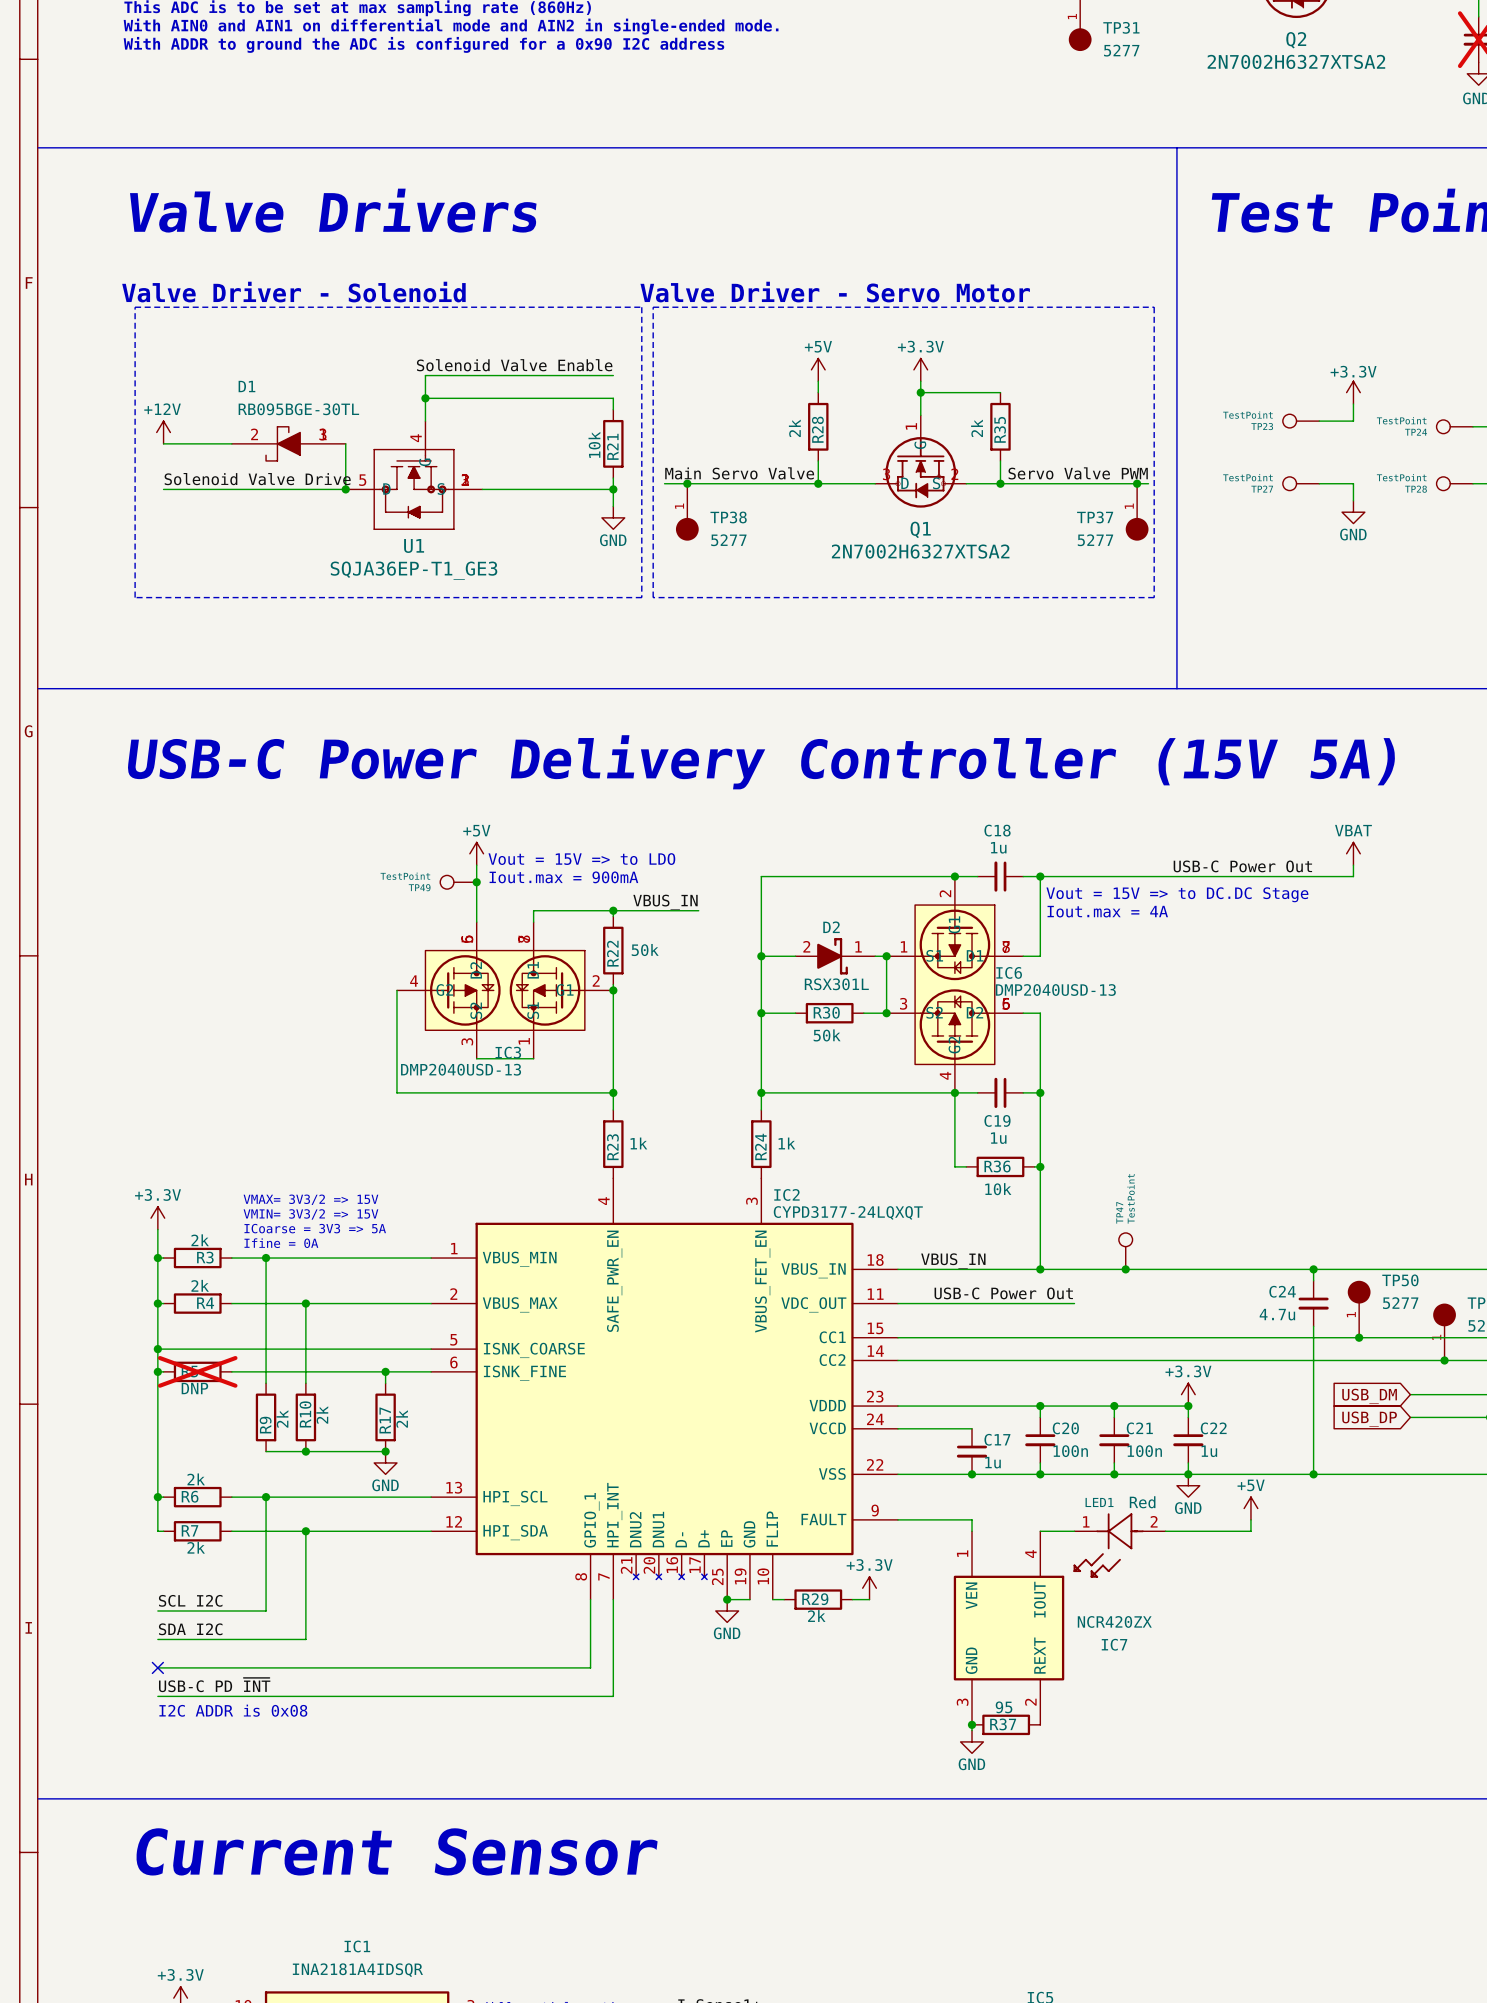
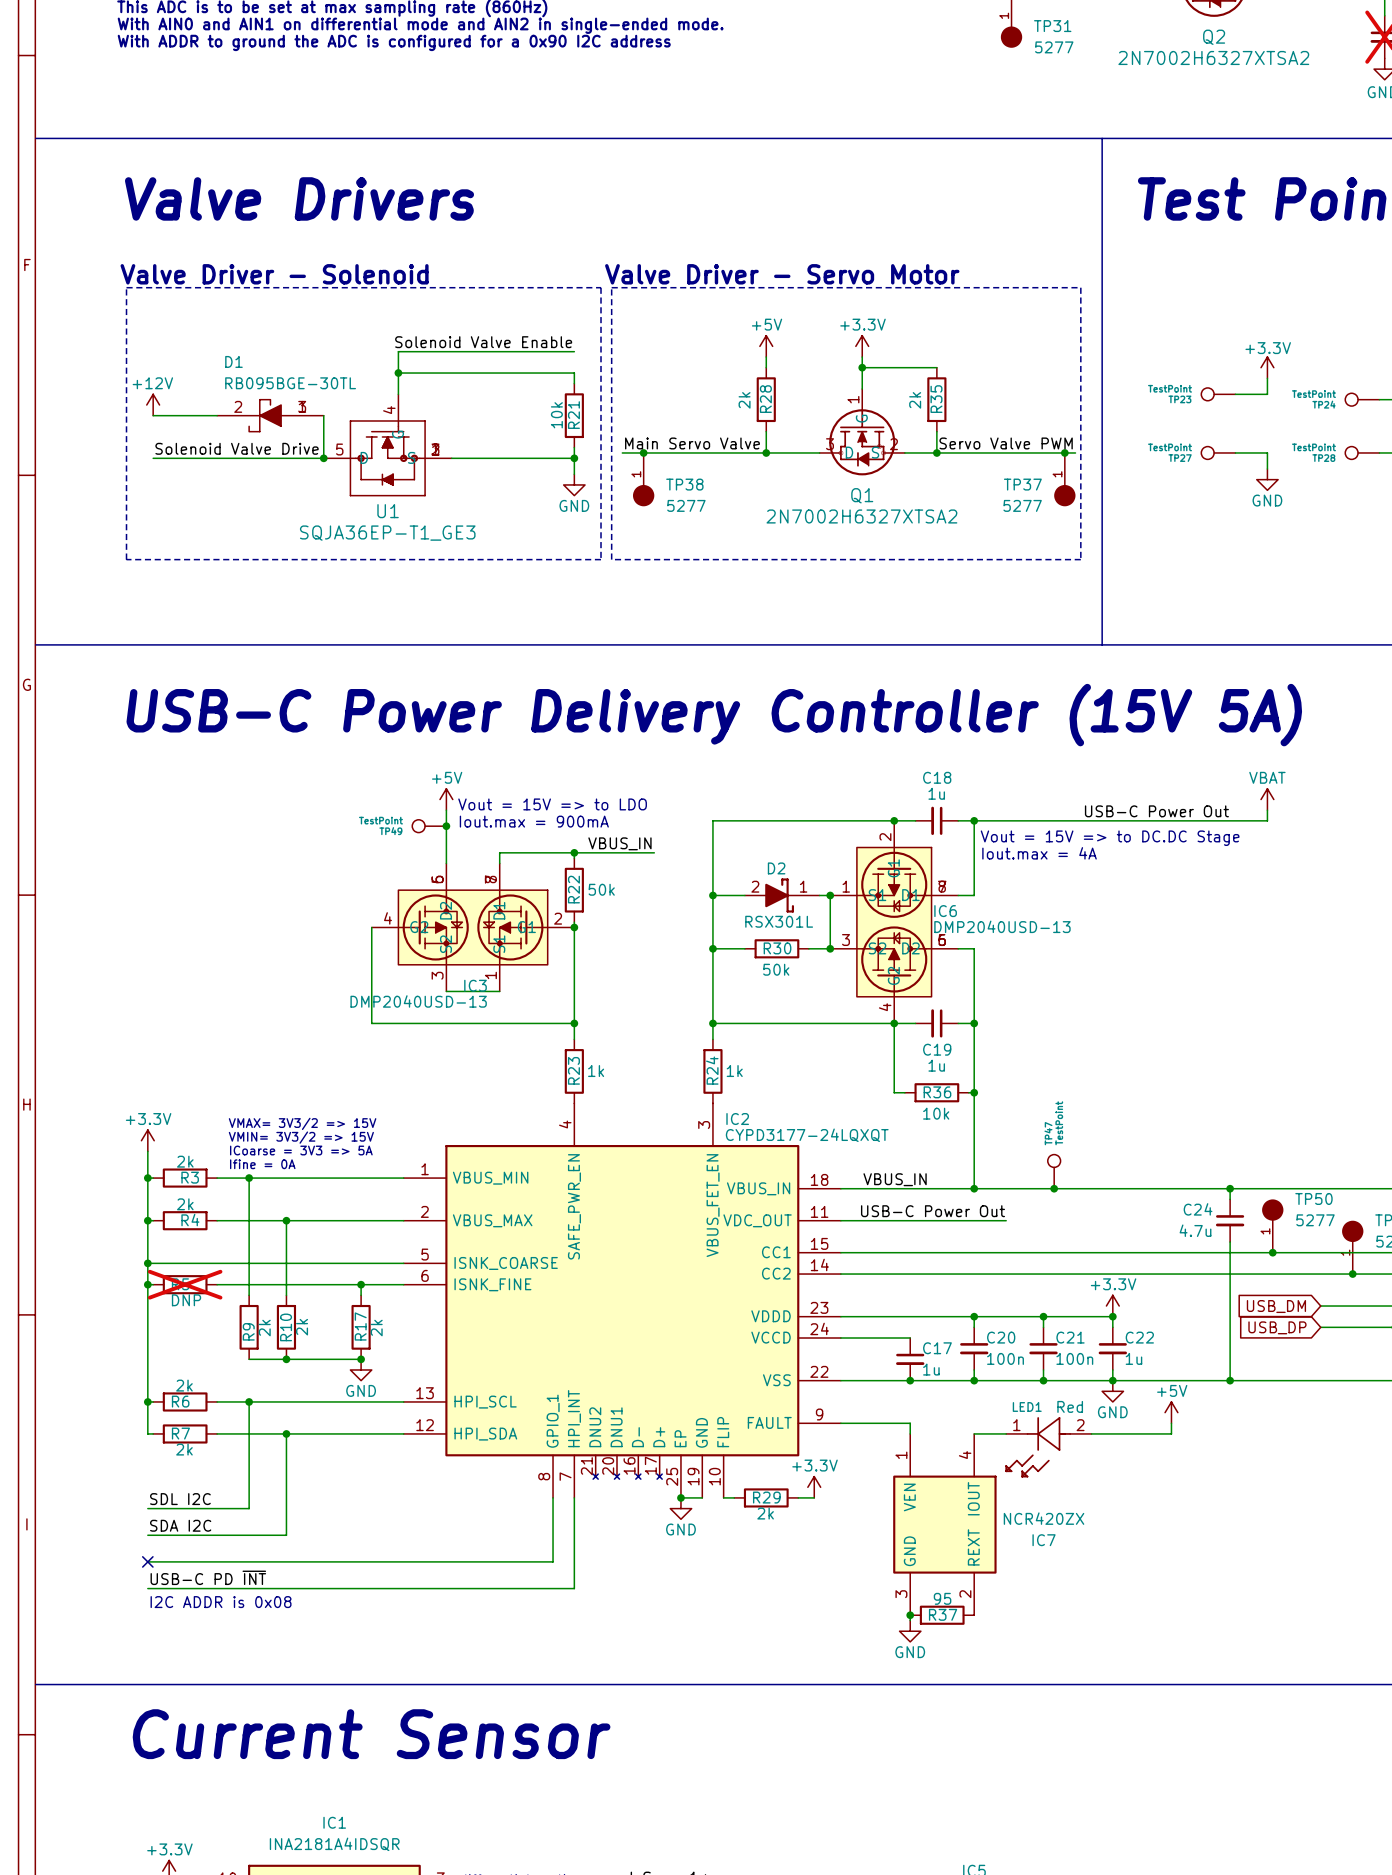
label: SCL I2C (190, 1600) -> SDL I2C (180, 1499)

